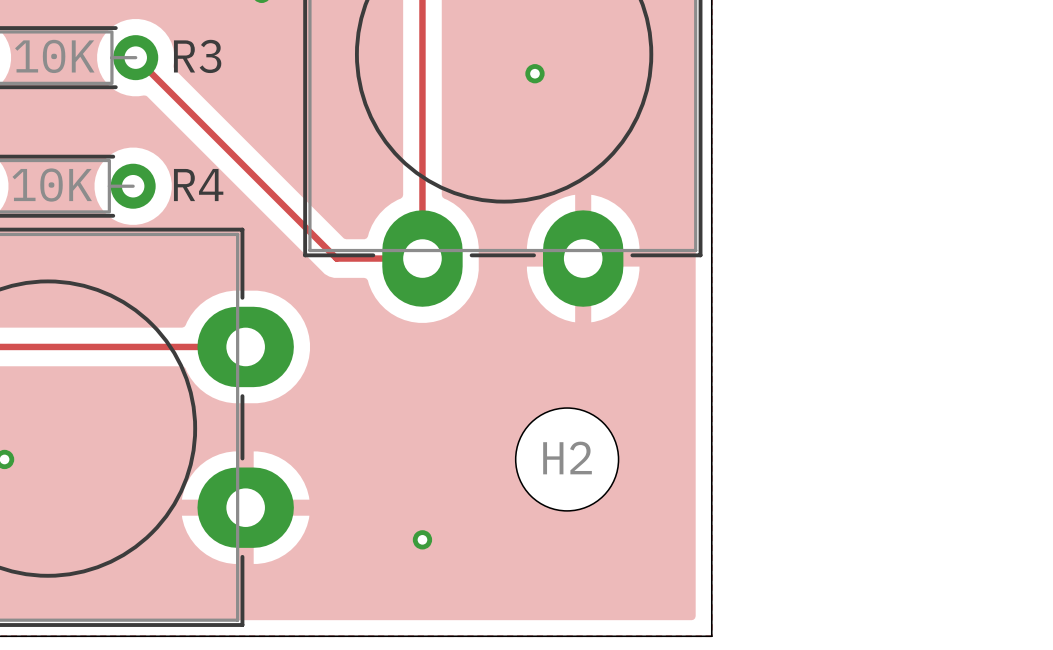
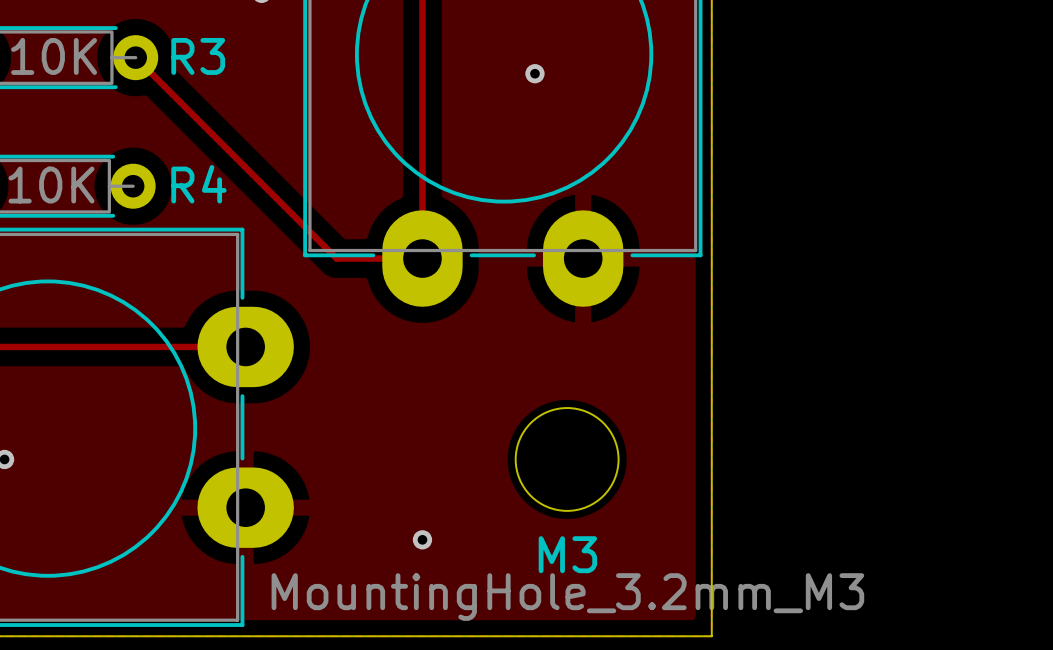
H2 name: H2 (567, 457) -> M3 (567, 554)
H2 value: none -> MountingHole_3.2mm_M3 (567, 597)

